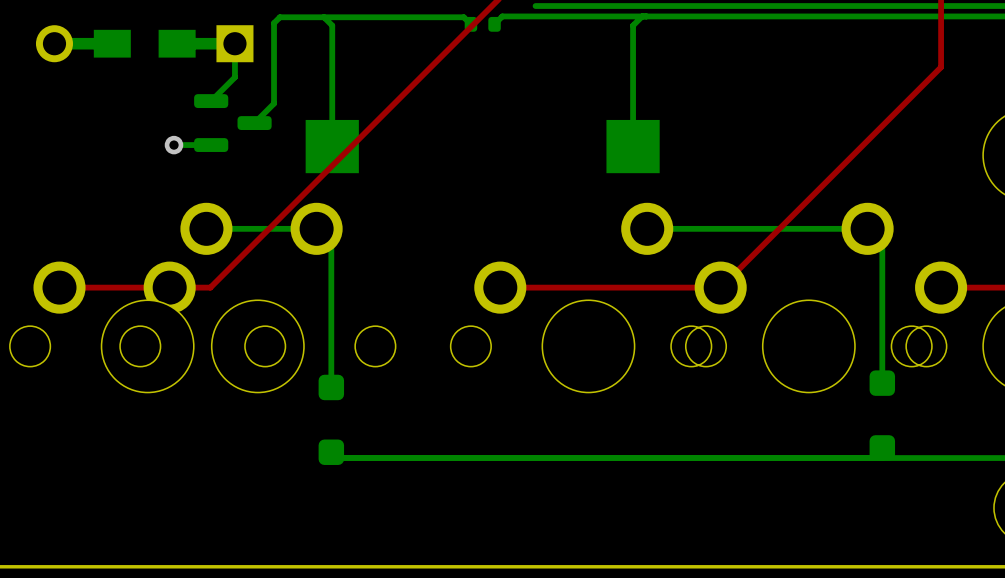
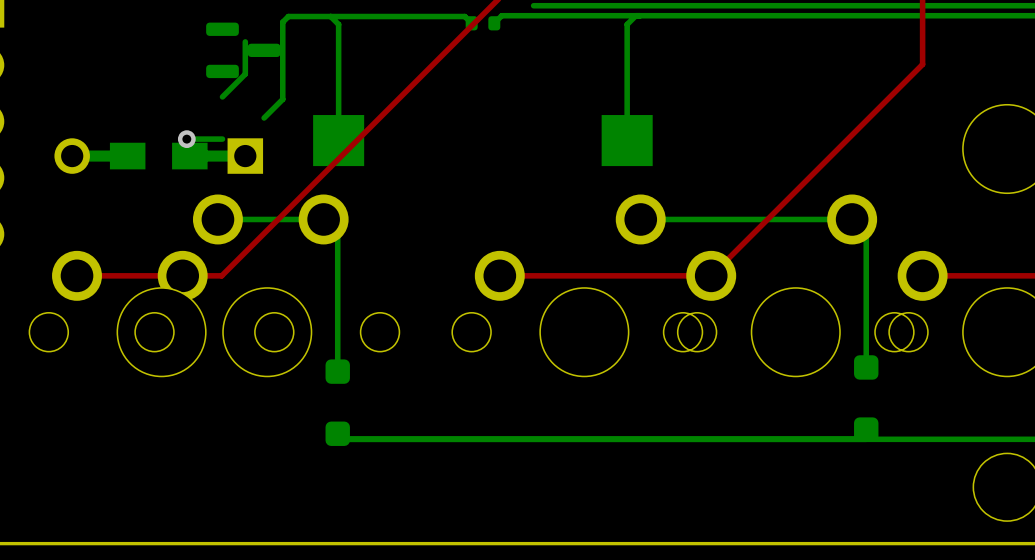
part position: (144, 43) -> (158, 156)
part position: (232, 123) -> (243, 50)

